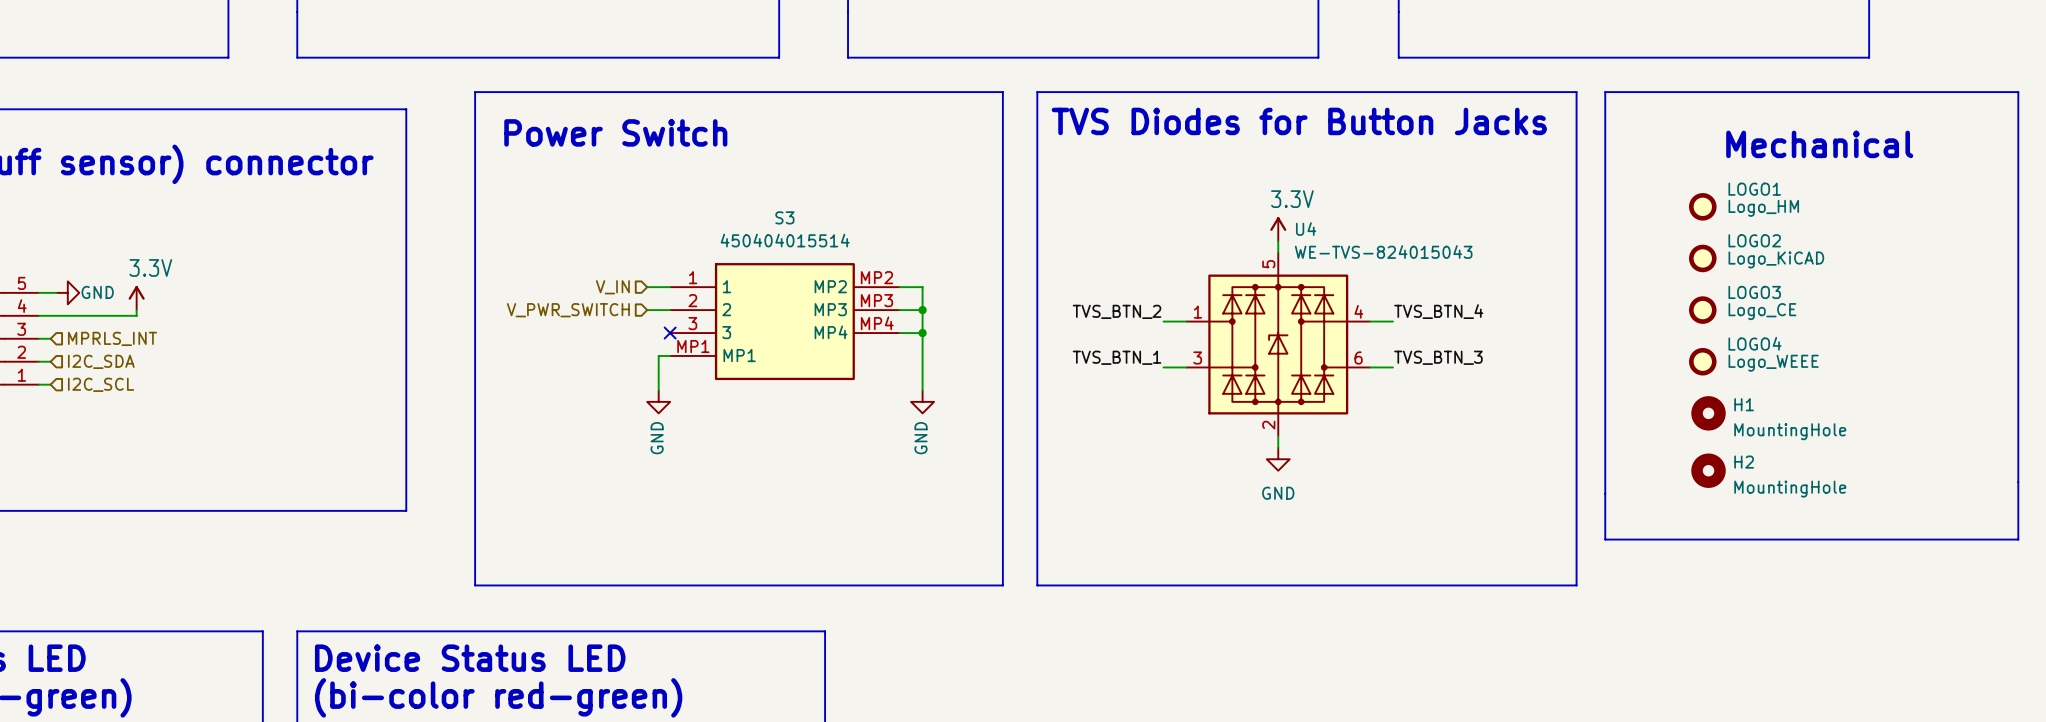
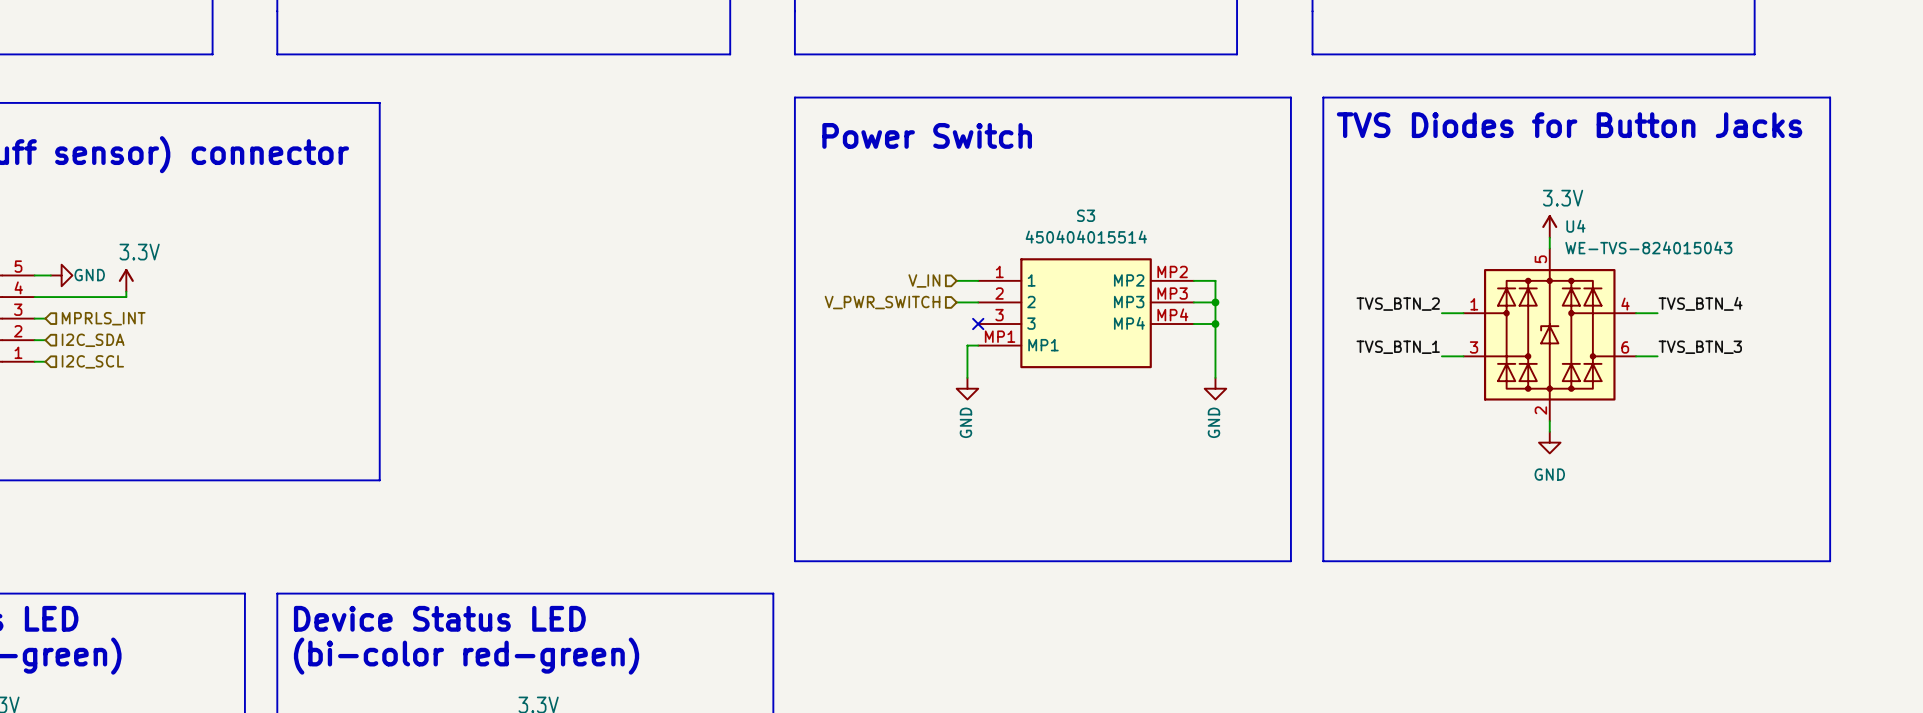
line: (475, 92) (1002, 92) (1002, 585) (475, 585) (475, 92) -> none
line: (1037, 92) (1576, 92) (1576, 585) (1037, 585) (1037, 92) -> none
line: (1605, 92) (1605, 539) (2018, 539) (2018, 92) (1605, 92) -> none
line: none -> (794, 97) (1290, 97) (1290, 561) (794, 561) (794, 97)
line: none -> (1323, 97) (1830, 97) (1830, 561) (1323, 561) (1323, 97)
text: TVS Diodes for Button Jacks (1299, 121) -> none
text: Power Switch (615, 132) -> none
text: none -> TVS Diodes for Button Jacks (1569, 125)
text: none -> Power Switch (927, 135)
text: Mechanical (1819, 144) -> none
LOGO1: Logo_HM (1702, 206) -> none
power symbol: 3.3V (1278, 229) -> none
power symbol: none -> 3.3V (1549, 226)
wire: (1278, 241) (1278, 252) -> none
wire: none -> (1549, 237) (1549, 248)
LOGO2: Logo_KiCAD (1702, 258) -> none
hierarchical label: V_IN (612, 287) -> none
wire: (647, 287) (670, 287) -> none
wire: (899, 287) (922, 287) (922, 390) -> none
hierarchical label: none -> V_IN (924, 280)
hierarchical label: V_PWR_SWITCH (568, 310) -> none
wire: (647, 310) (670, 310) -> none
wire: (899, 310) (922, 310) -> (956, 280) (978, 280)
junction: (922, 310) -> none
LOGO3: Logo_CE (1702, 310) -> none
label: TVS_BTN_2 (1117, 311) -> none
label: TVS_BTN_4 (1438, 311) -> TVS_BTN_2 (1398, 304)
S3 position: (784, 321) -> (1086, 313)
hierarchical label: none -> V_PWR_SWITCH (882, 302)
junction: none -> (1215, 302)
wire: (1370, 321) (1393, 321) -> (1441, 313) (1463, 313)
label: none -> TVS_BTN_4 (1700, 303)
no-connect mark: (670, 333) -> none
wire: (899, 333) (922, 333) -> (956, 302) (978, 302)
junction: (922, 333) -> none
wire: none -> (1636, 313) (1657, 313)
no-connect mark: none -> (978, 324)
U4 position: (1278, 344) -> (1549, 334)
junction: none -> (1215, 324)
wire: (670, 355) (658, 355) (658, 390) -> none
label: TVS_BTN_1 (1117, 357) -> none
label: TVS_BTN_3 (1438, 357) -> TVS_BTN_1 (1398, 347)
LOGO4: Logo_WEEE (1702, 361) -> none
wire: none -> (978, 345) (967, 345) (967, 377)
wire: (1370, 367) (1393, 367) -> (1441, 356) (1463, 356)
label: none -> TVS_BTN_3 (1700, 347)
wire: none -> (1636, 356) (1657, 356)
power symbol: GND (658, 401) -> none
power symbol position: GND (922, 401) -> GND (967, 388)
H1: MountingHole (1708, 413) -> none
wire: (1278, 436) (1278, 447) -> none
wire: none -> (1549, 421) (1549, 431)
power symbol position: GND (1278, 459) -> GND (1215, 388)
power symbol: none -> GND (1549, 442)
H2: MountingHole (1708, 470) -> none
power symbol text rotation: 0° (1278, 493) -> 90° counterclockwise (1213, 422)

